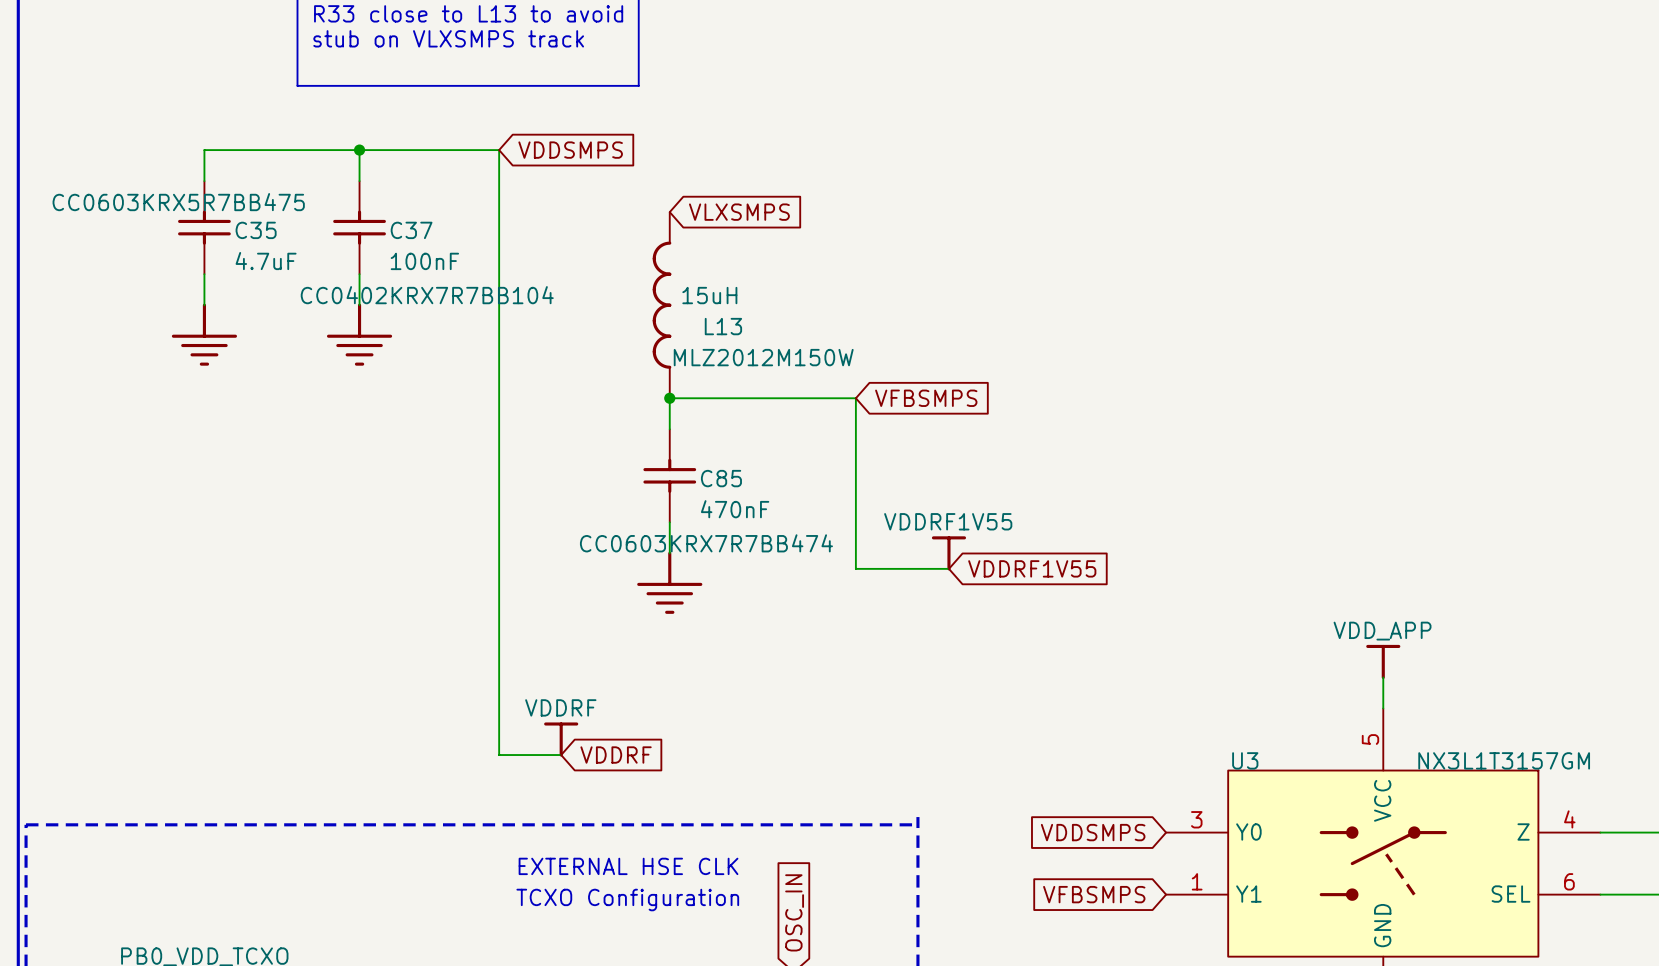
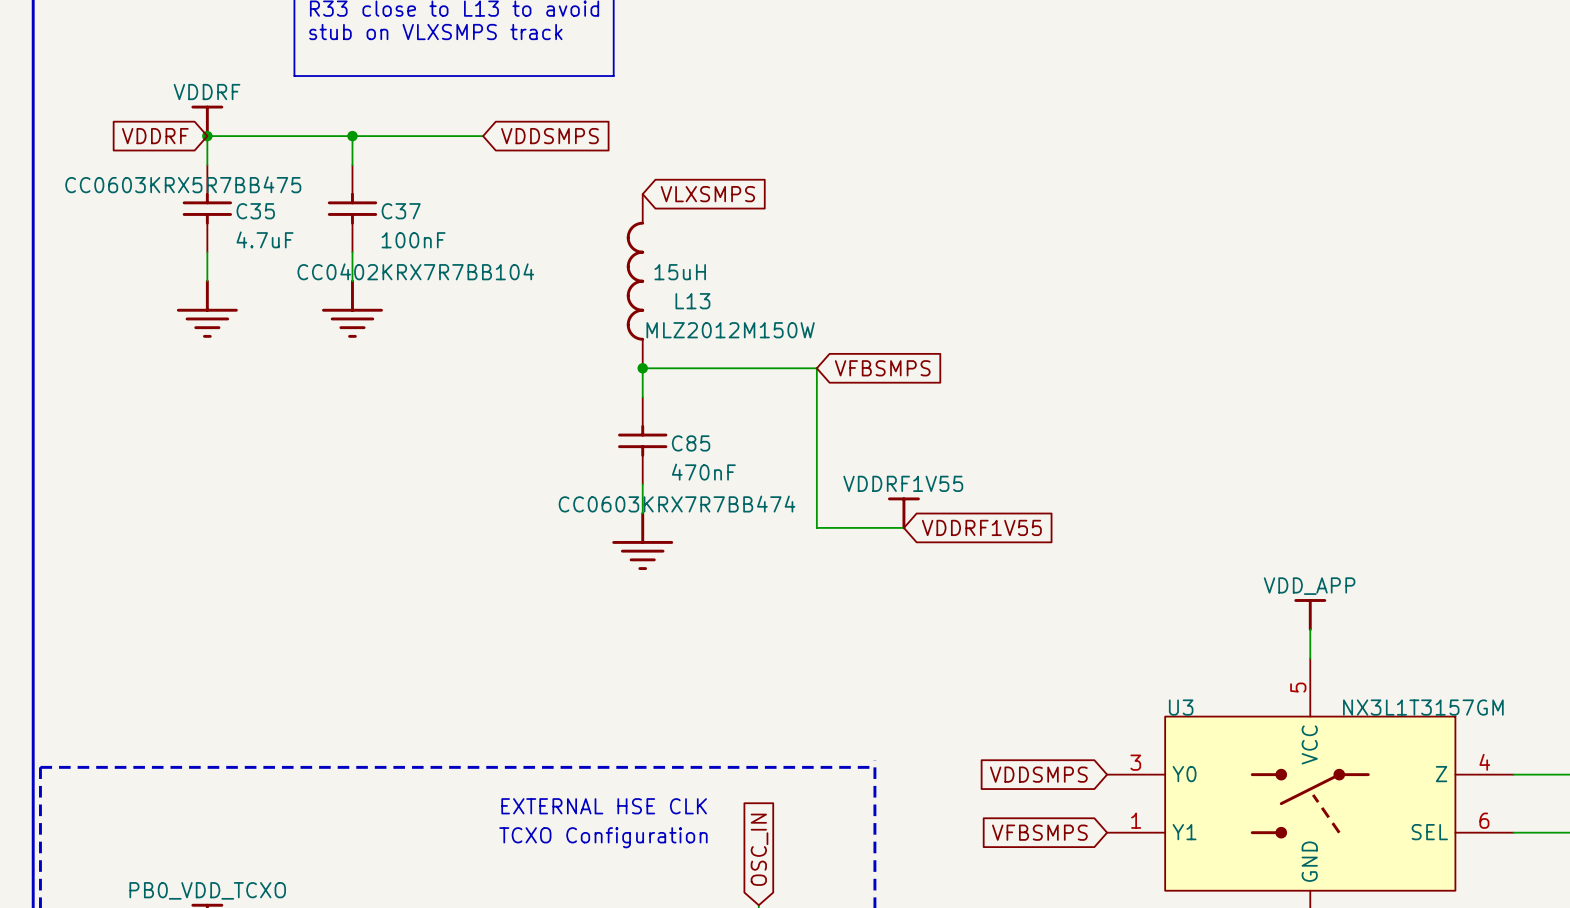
power symbol: none -> VDDRF (207, 121)
global label: none -> VDDRF (155, 136)
junction: none -> (207, 136)
wire: (499, 150) (499, 755) (561, 755) -> none
power symbol: VDDRF (561, 739) -> none
global label: VDDRF (616, 755) -> none

